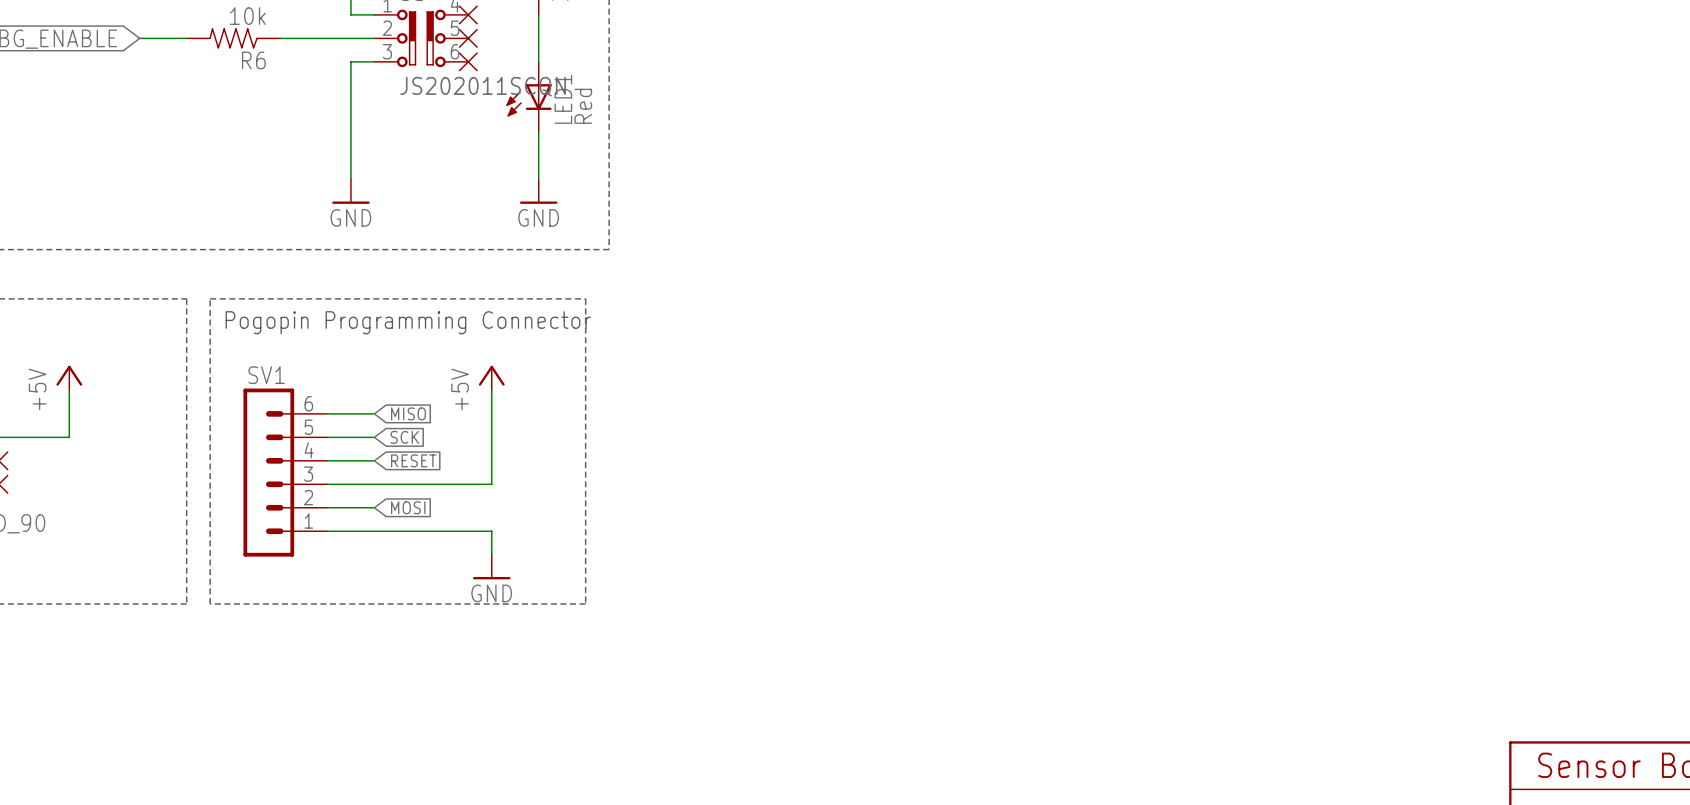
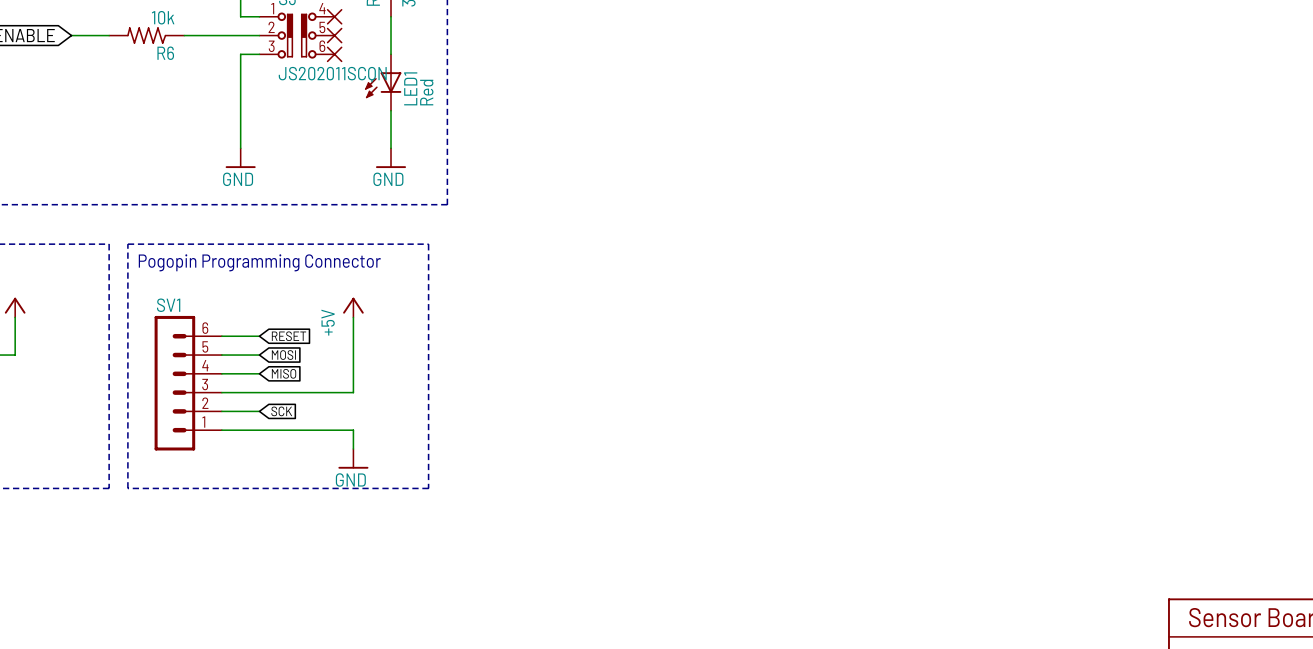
global label: MISO (408, 413) -> RESET (289, 336)
global label: SCK (404, 437) -> MOSI (283, 355)
global label: RESET (413, 460) -> MISO (284, 373)
global label: MOSI (408, 507) -> SCK (281, 411)

